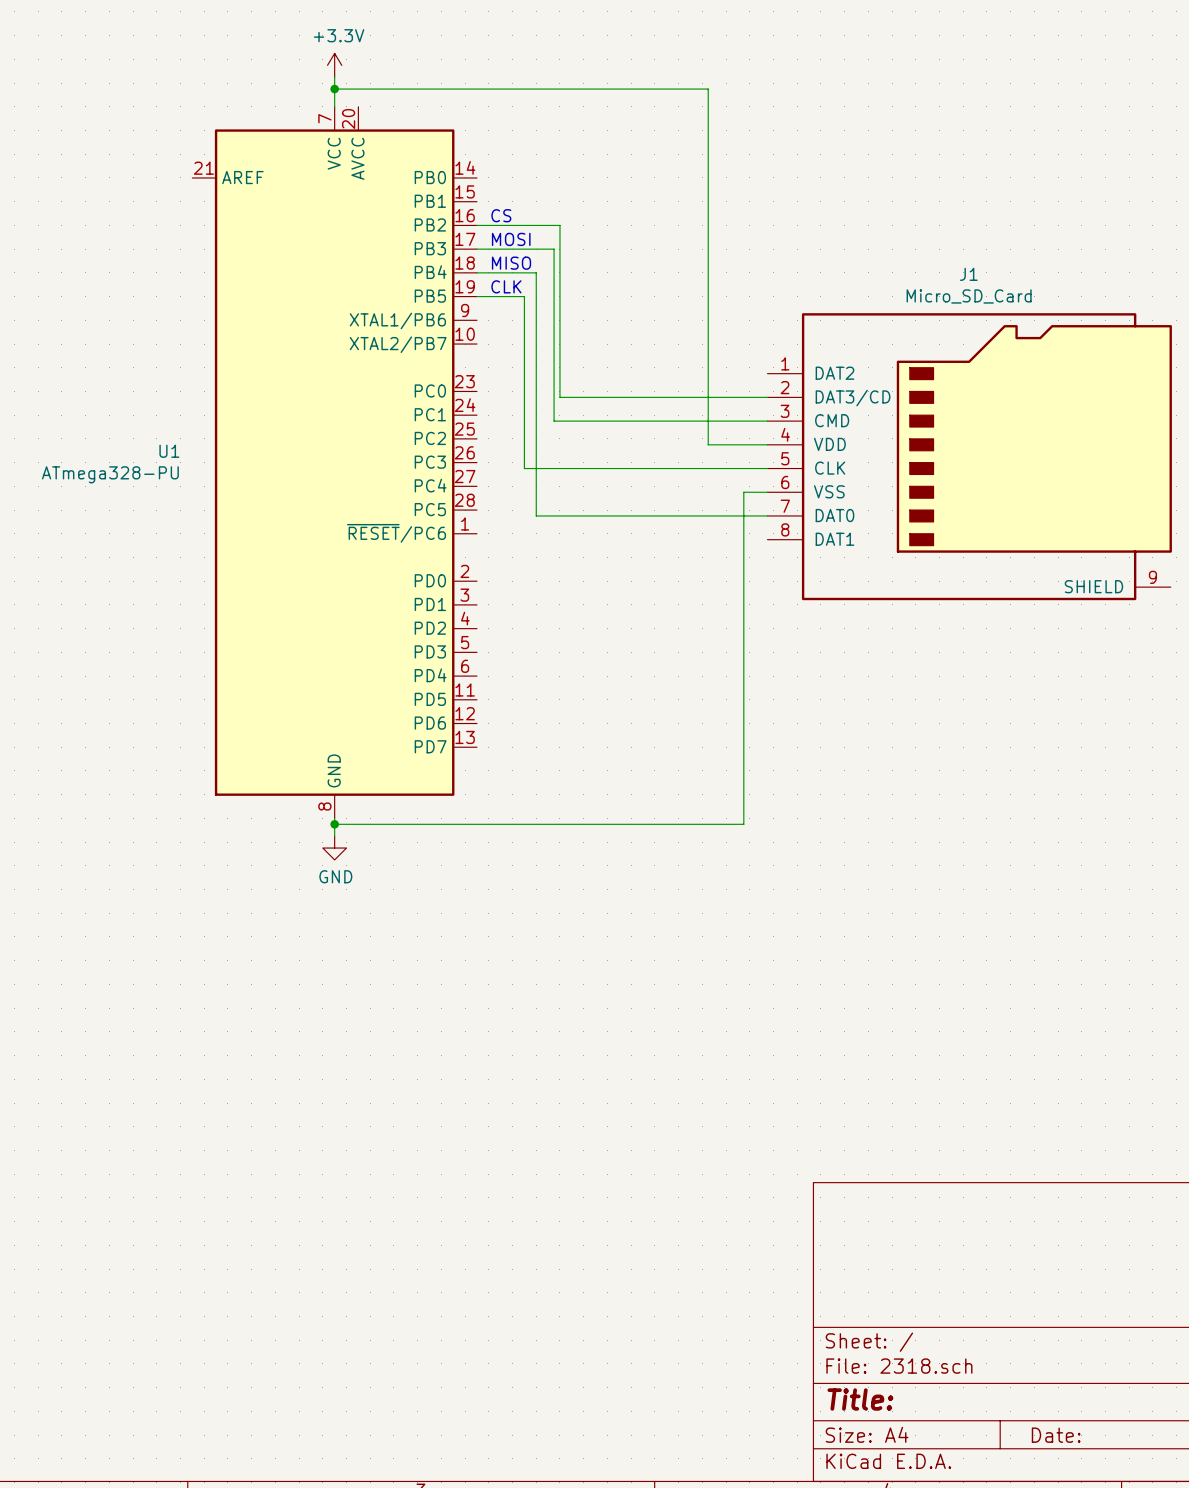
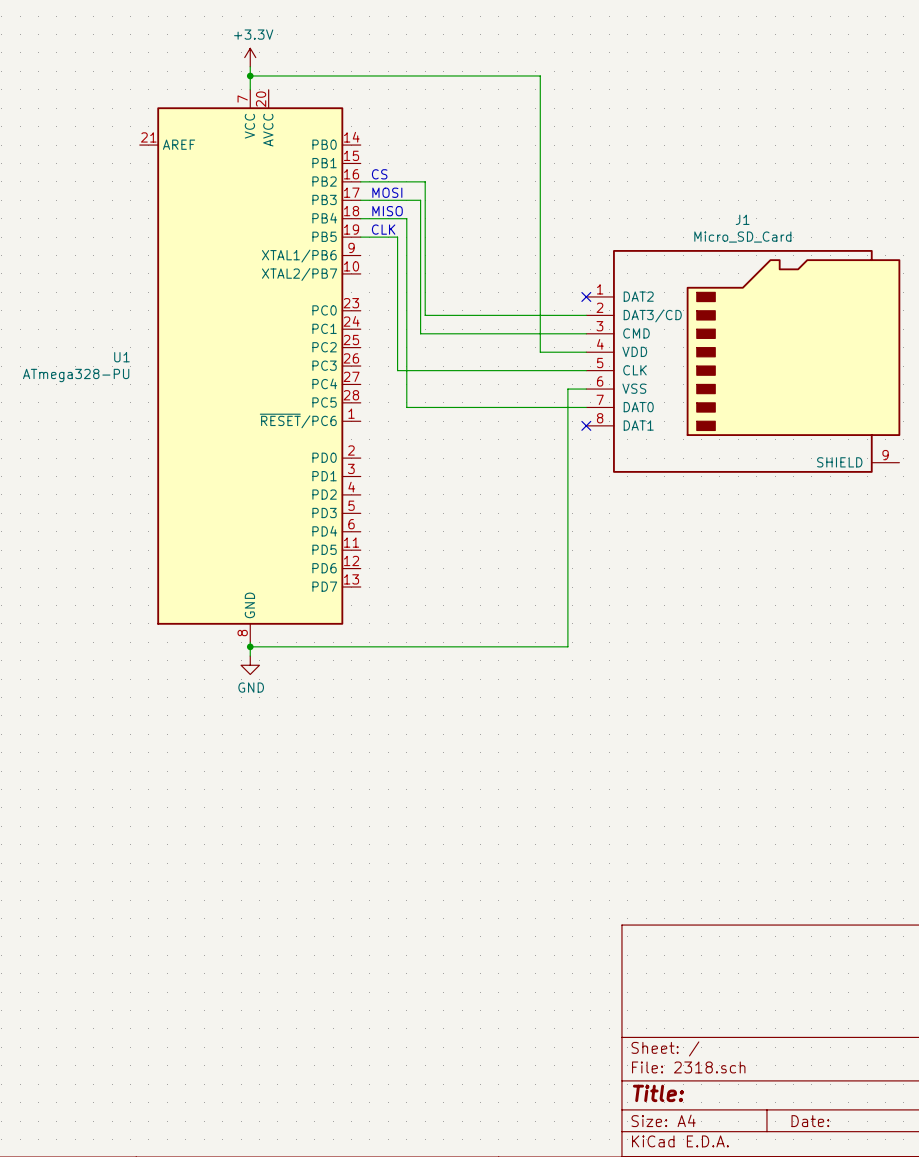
no-connect mark: none -> (586, 296)
no-connect mark: none -> (586, 425)

